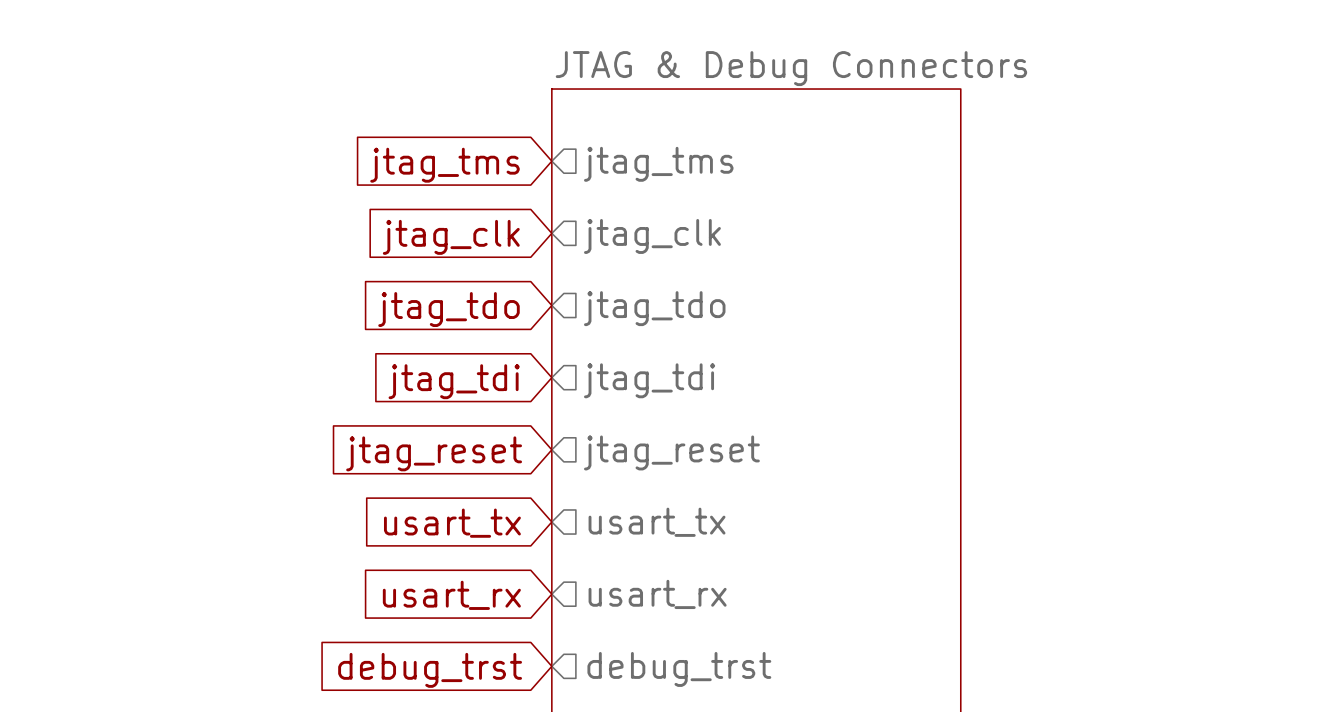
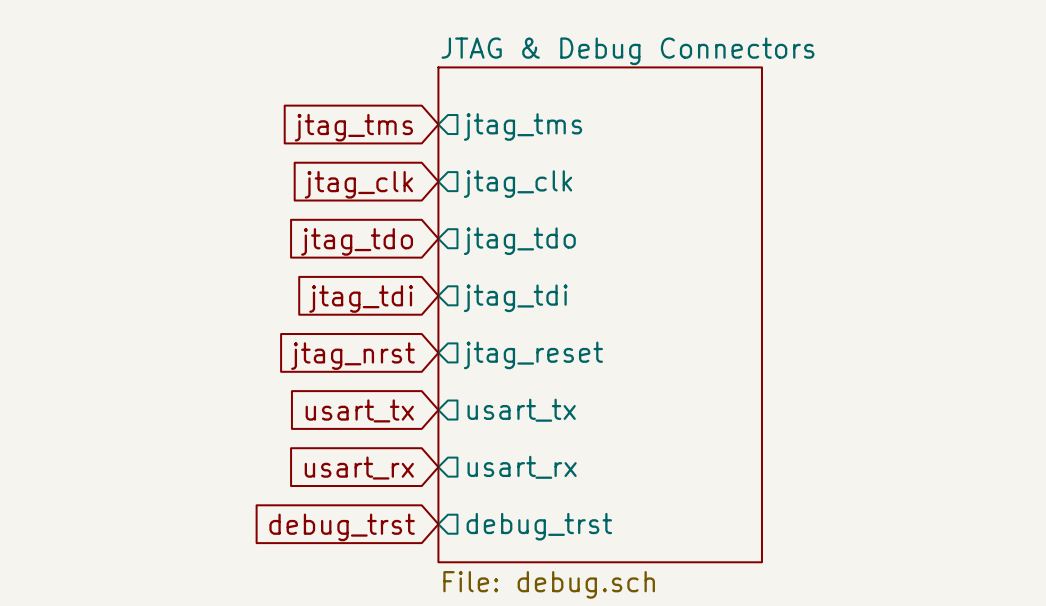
global label: jtag_reset (434, 453) -> jtag_nrst (352, 356)

